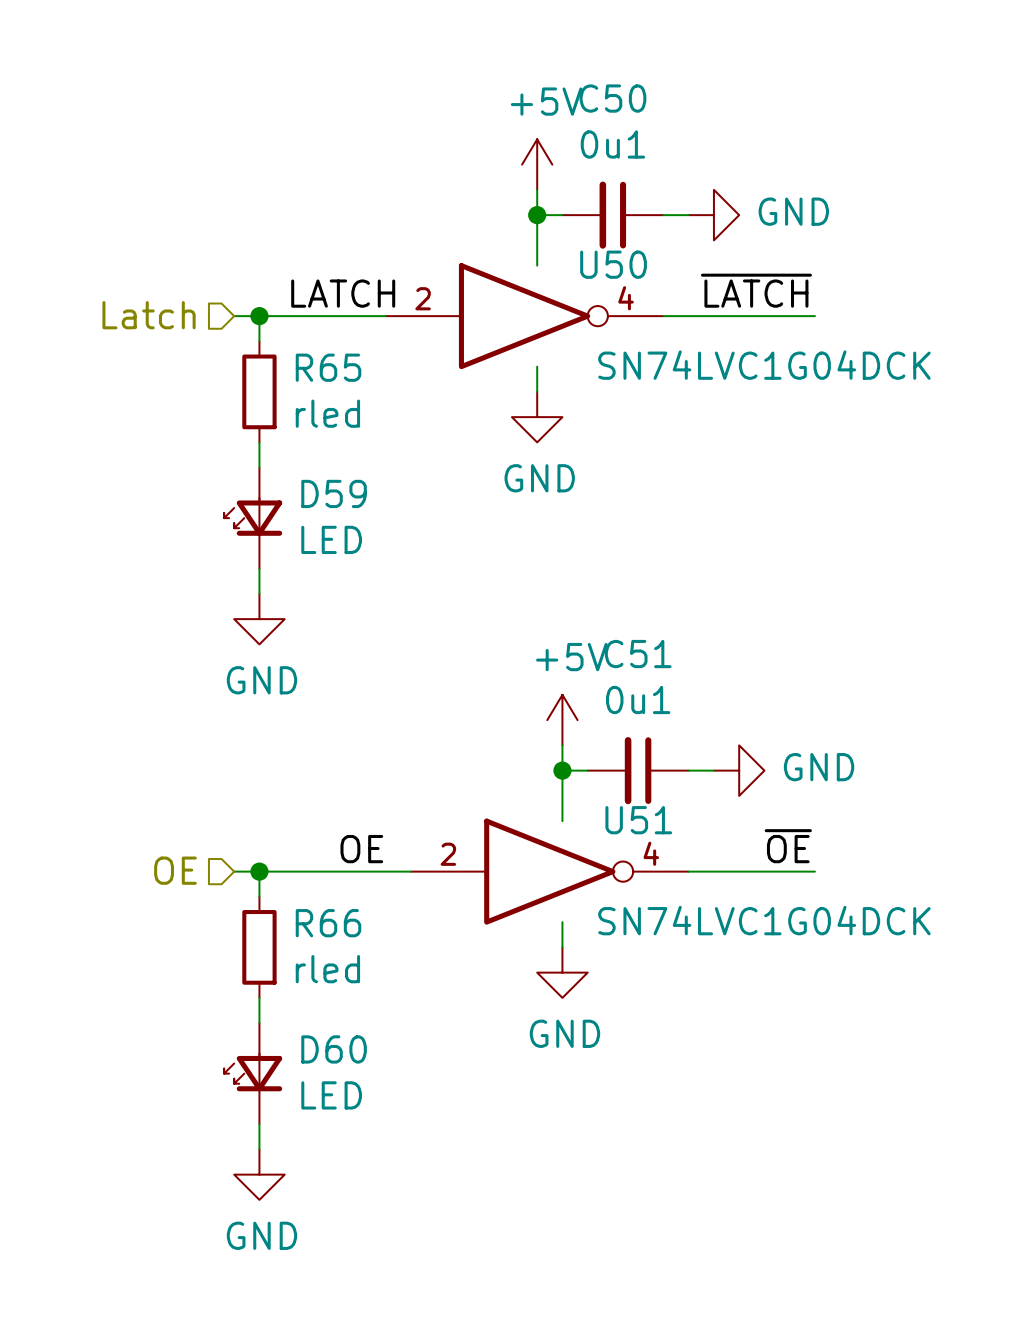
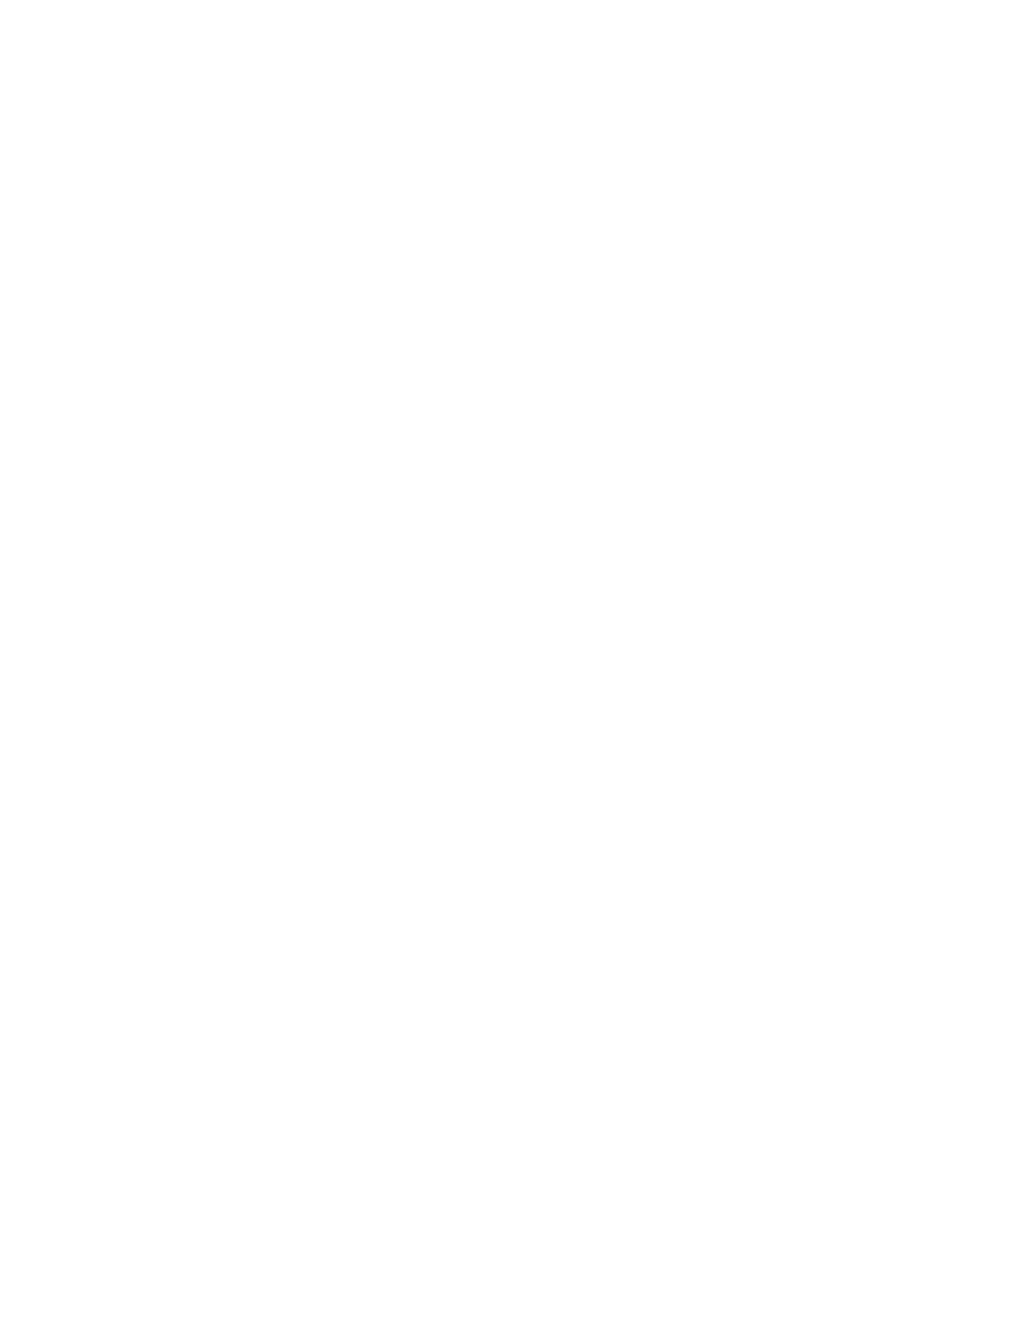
power symbol: +5V (537, 164) -> none
wire: (537, 189) (537, 265) -> none
wire: (537, 215) (562, 215) -> none
junction: (537, 215) -> none
C50: 0u1 (612, 215) -> none
wire: (663, 215) (688, 215) -> none
power symbol: GND (713, 215) -> none
label: ~{LATCH} (756, 290) -> none
label: LATCH (343, 293) -> none
hierarchical label: Latch (149, 315) -> none
wire: (234, 316) (385, 316) -> none
wire: (259, 316) (259, 341) -> none
junction: (259, 316) -> none
U50: SN74LVC1G04DCK (524, 316) -> none
wire: (663, 316) (814, 316) -> none
wire: (537, 366) (537, 391) -> none
R65: rled (259, 391) -> none
power symbol: GND (537, 417) -> none
wire: (259, 442) (259, 467) -> none
D59: LED (253, 518) -> none
wire: (259, 568) (259, 593) -> none
power symbol: GND (259, 619) -> none
power symbol: +5V (562, 720) -> none
wire: (562, 745) (562, 821) -> none
wire: (562, 770) (587, 770) -> none
junction: (562, 770) -> none
C51: 0u1 (638, 770) -> none
wire: (688, 770) (713, 770) -> none
power symbol: GND (739, 770) -> none
label: ~{OE} (788, 846) -> none
label: OE (361, 849) -> none
hierarchical label: OE (175, 870) -> none
wire: (234, 871) (410, 871) -> none
wire: (259, 871) (259, 896) -> none
junction: (259, 871) -> none
U51: SN74LVC1G04DCK (549, 871) -> none
wire: (688, 871) (814, 871) -> none
wire: (562, 922) (562, 947) -> none
R66: rled (259, 947) -> none
power symbol: GND (562, 972) -> none
wire: (259, 997) (259, 1023) -> none
D60: LED (253, 1073) -> none
wire: (259, 1124) (259, 1149) -> none
power symbol: GND (259, 1174) -> none

